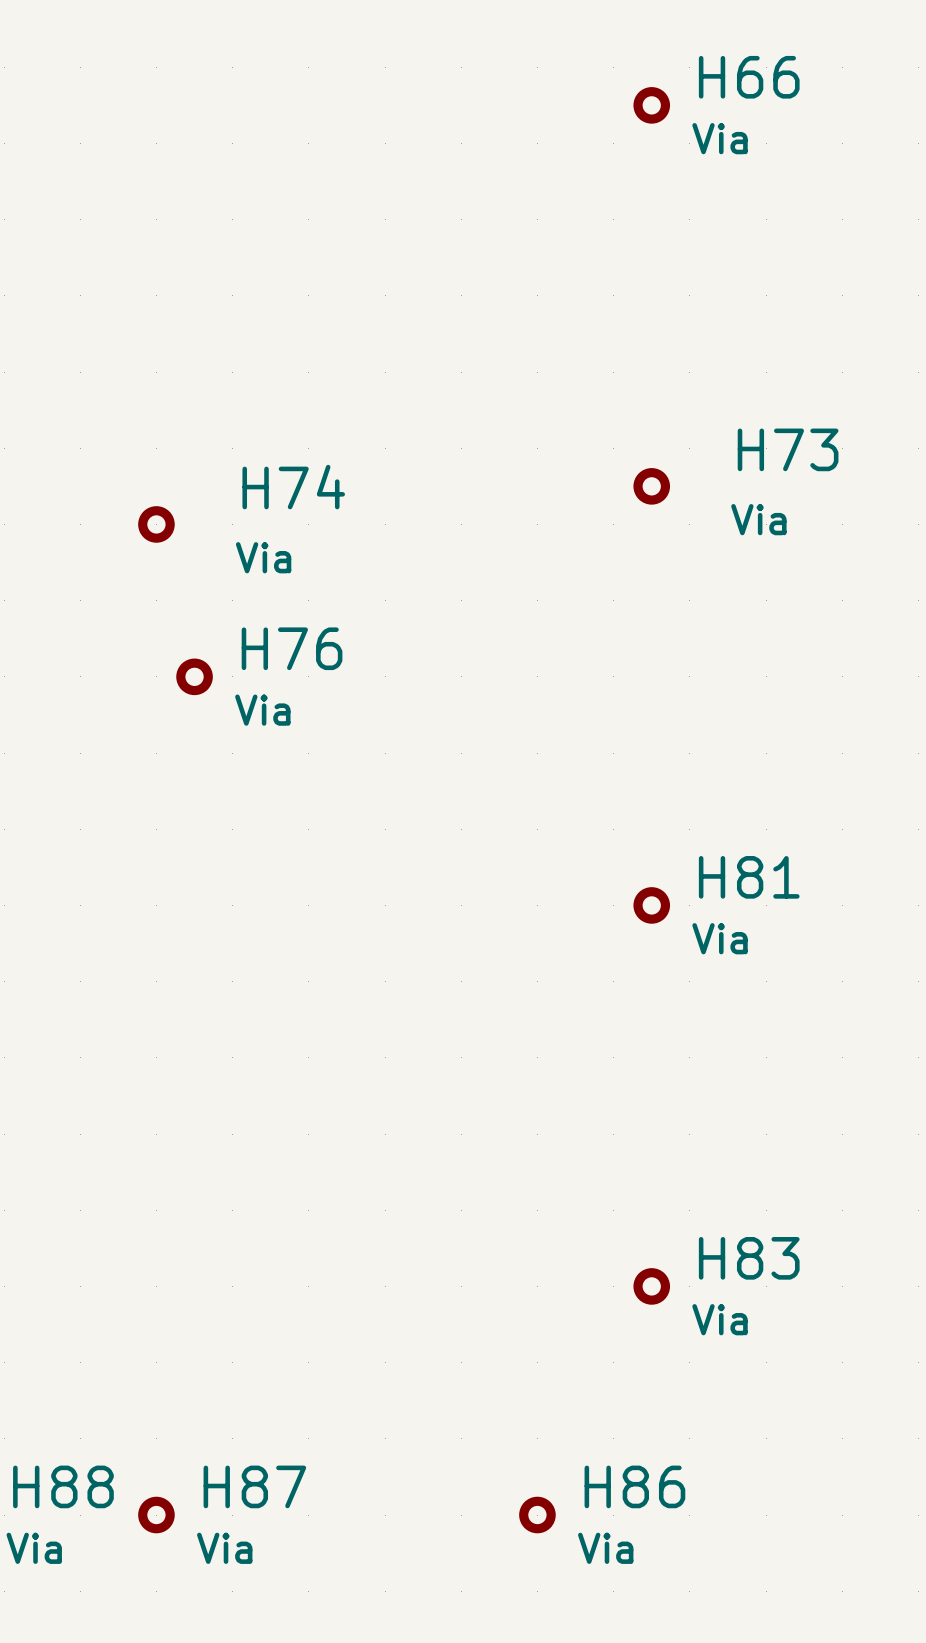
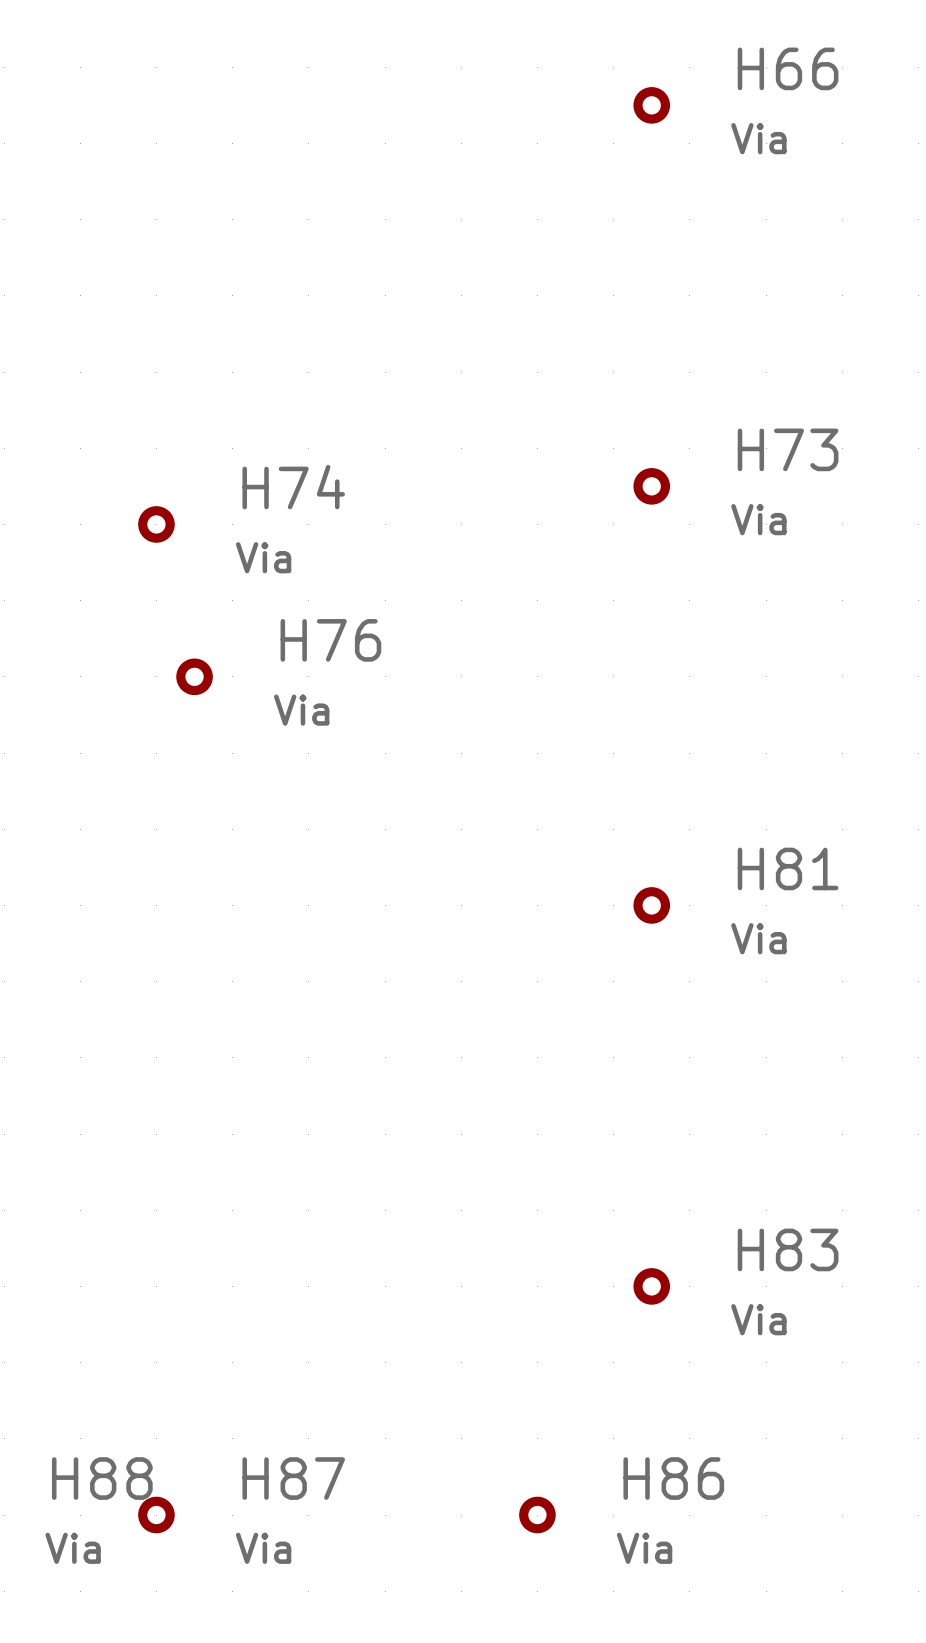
H66 name position: H66 (749, 77) -> H66 (788, 68)
H66 value position: Via (720, 138) -> Via (758, 138)
H76 name position: H76 (292, 648) -> H76 (330, 640)
H76 value position: Via (262, 710) -> Via (301, 710)
H81 name position: H81 (749, 877) -> H81 (788, 868)
H81 value position: Via (720, 938) -> Via (758, 938)
H83 name position: H83 (749, 1258) -> H83 (788, 1249)
H83 value position: Via (720, 1319) -> Via (758, 1319)
H88 name position: H88 (63, 1486) -> H88 (102, 1478)
H87 name position: H87 (254, 1486) -> H87 (293, 1478)
H86 name position: H86 (634, 1486) -> H86 (673, 1478)
H88 value position: Via (34, 1548) -> Via (73, 1548)
H87 value position: Via (224, 1548) -> Via (263, 1548)
H86 value position: Via (605, 1548) -> Via (644, 1548)

